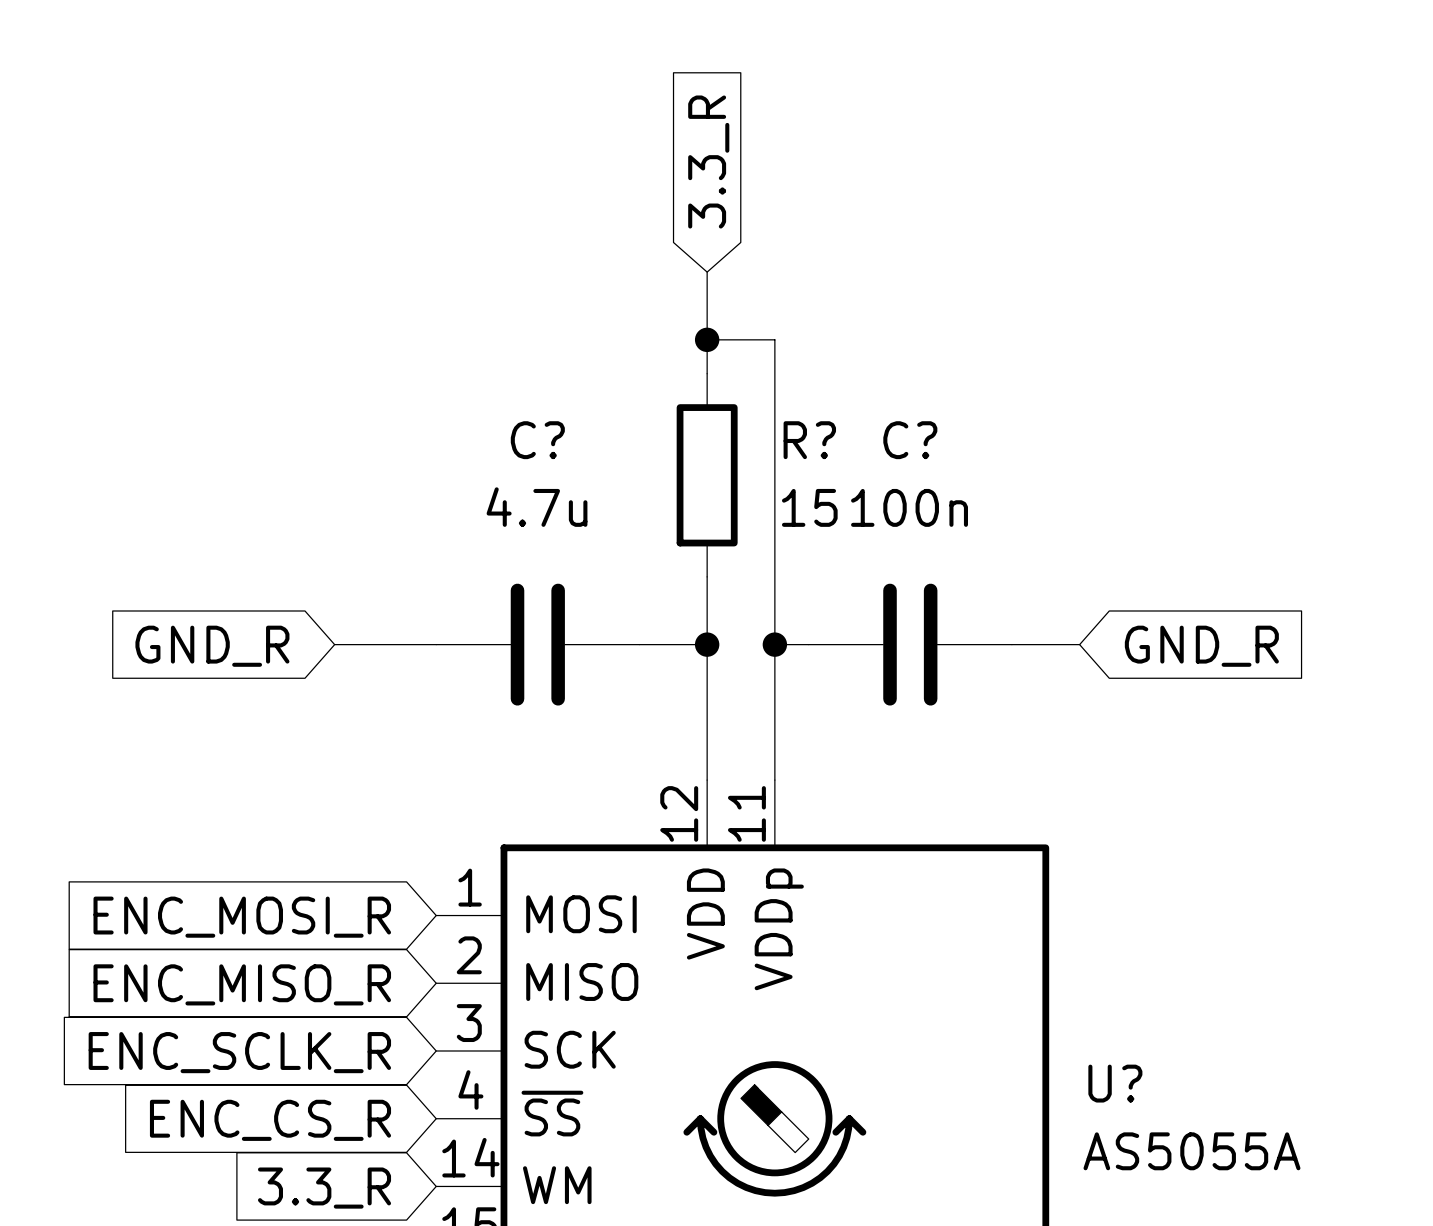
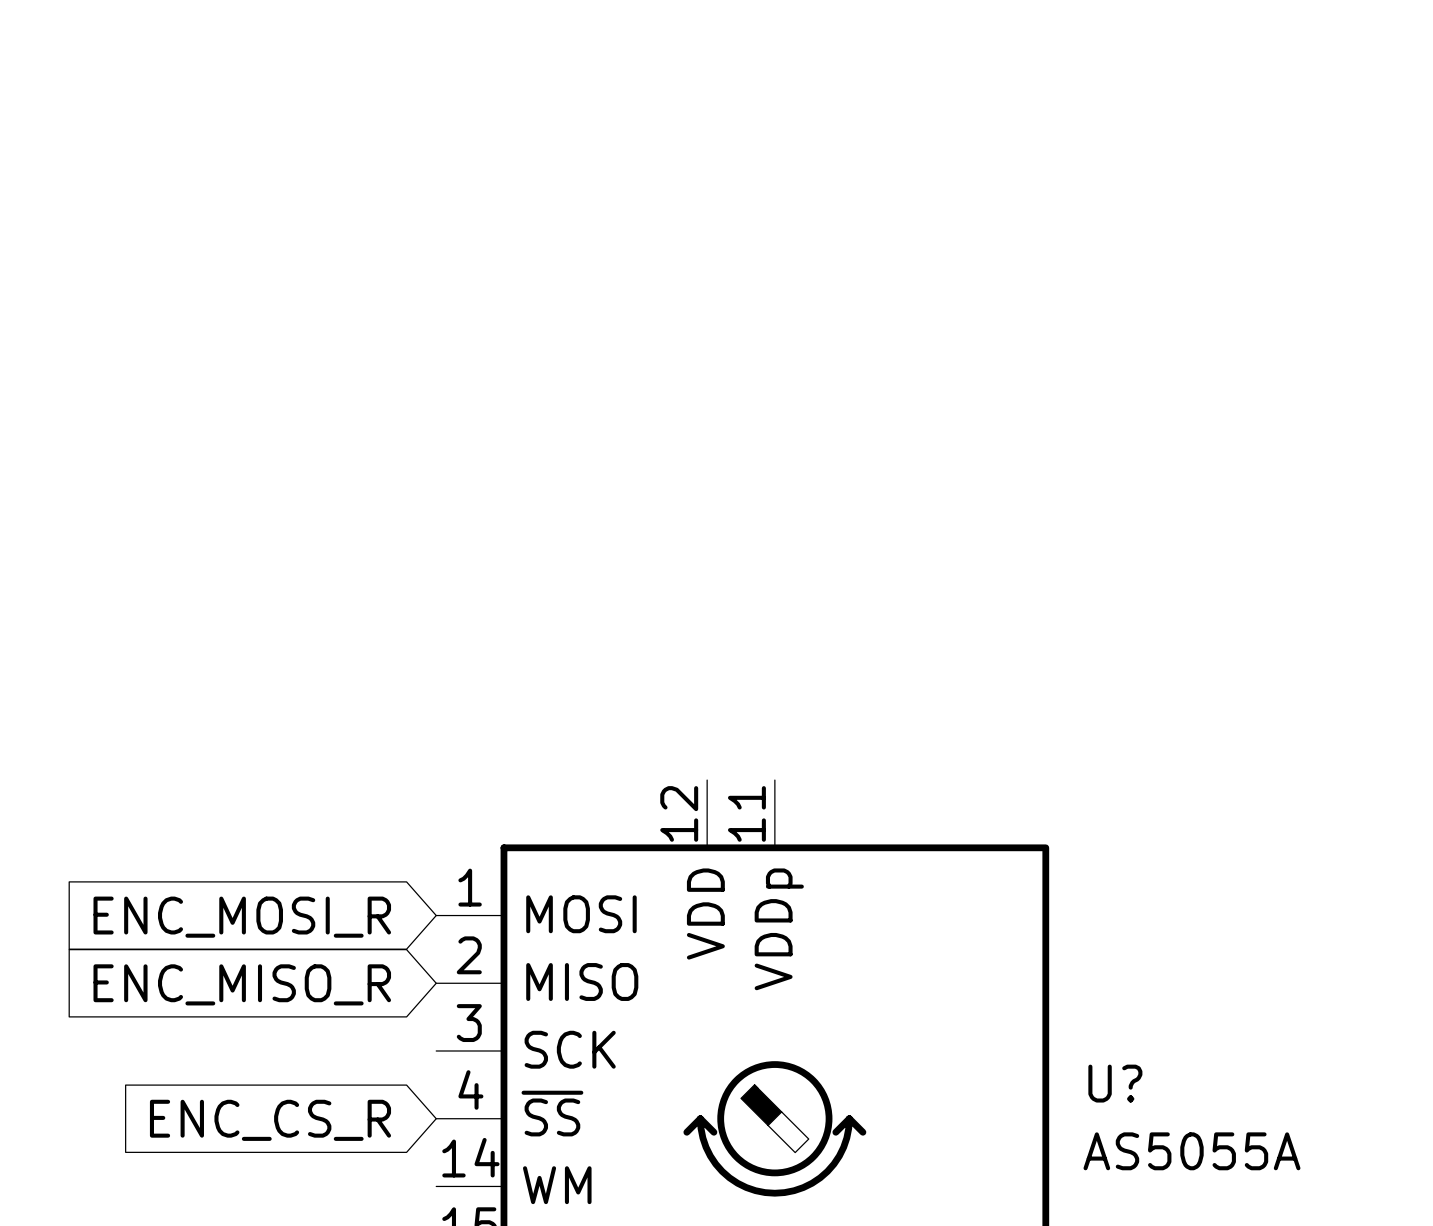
global label: 3.3_R (708, 162) -> none
wire: (707, 272) (707, 373) -> none
wire: (707, 339) (774, 339) (774, 780) -> none
junction: (707, 339) -> none
R?: 15 (707, 475) -> none
wire: (707, 576) (707, 780) -> none
wire: (334, 644) (436, 644) -> none
C?: 4.7u (537, 644) -> none
wire: (639, 644) (707, 644) -> none
junction: (707, 644) -> none
wire: (774, 644) (808, 644) -> none
junction: (774, 644) -> none
C?: 100n (910, 644) -> none
wire: (1011, 644) (1079, 644) -> none
global label: GND_R (212, 646) -> none
global label: GND_R (1201, 646) -> none
global label: ENC_SCLK_R (239, 1052) -> none
global label: 3.3_R (324, 1188) -> none

